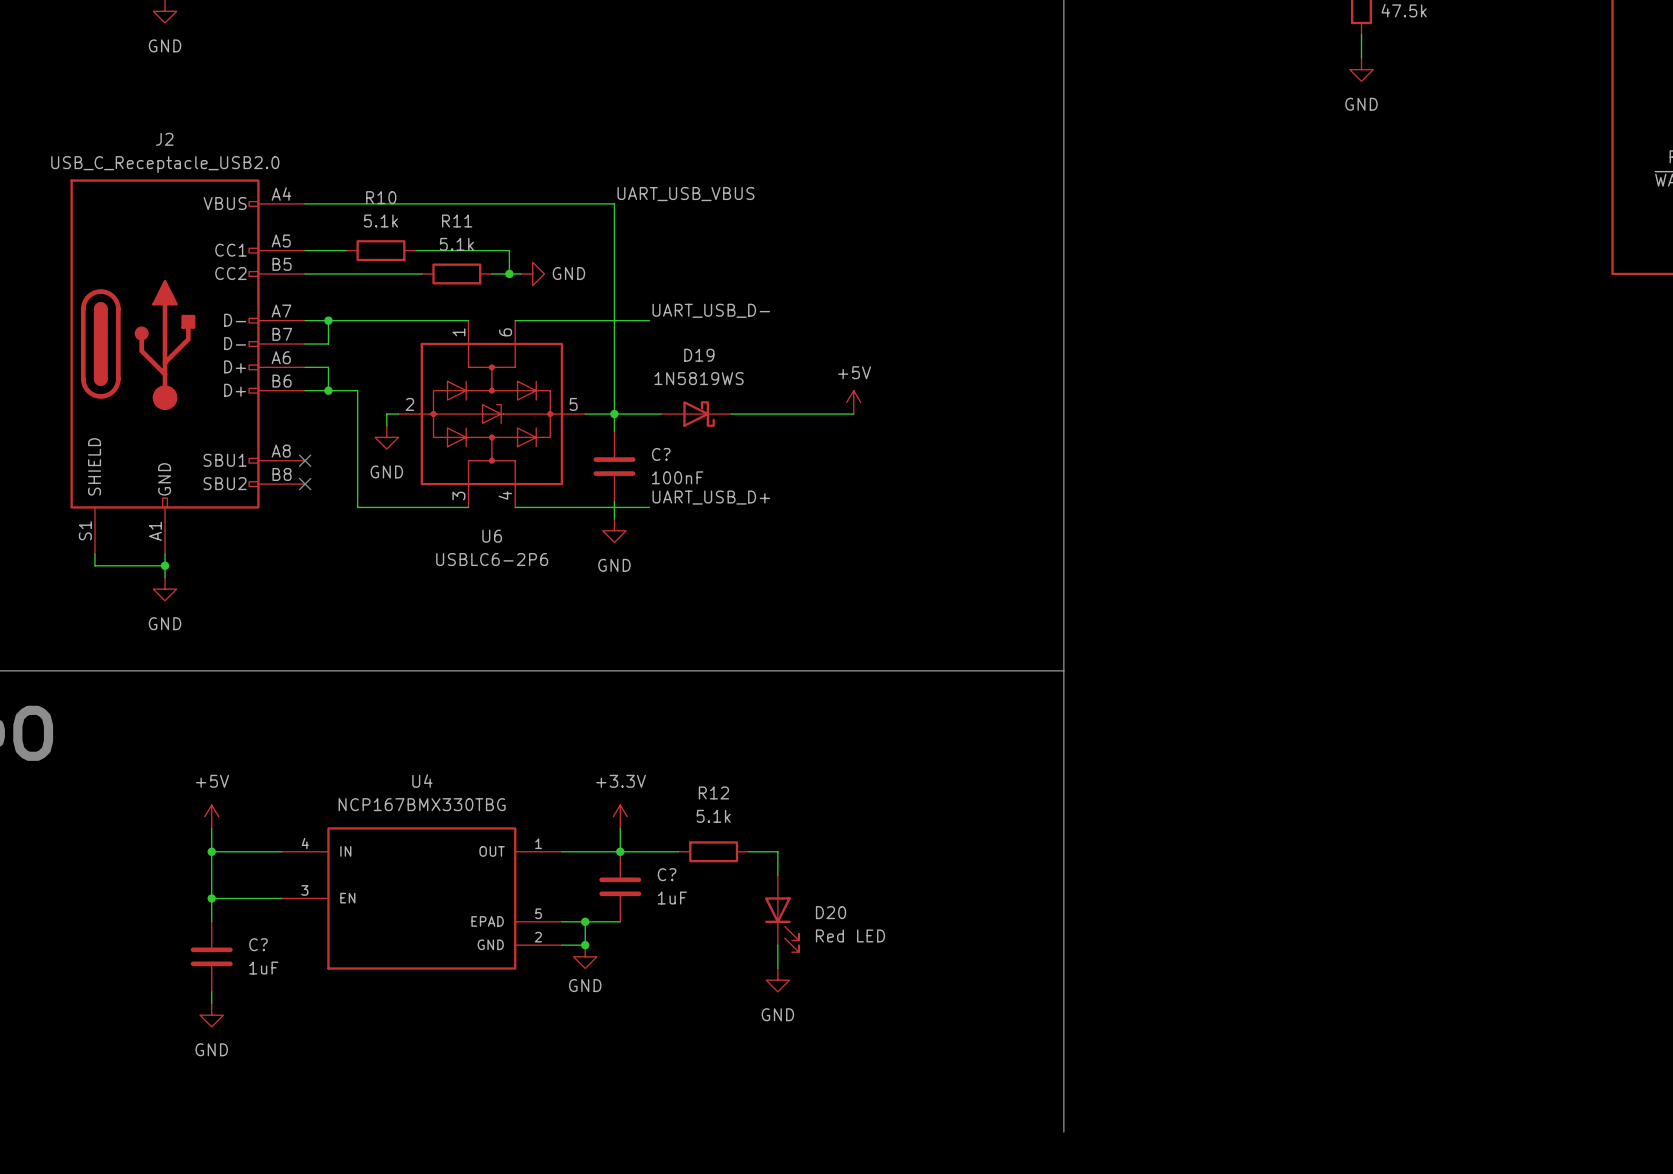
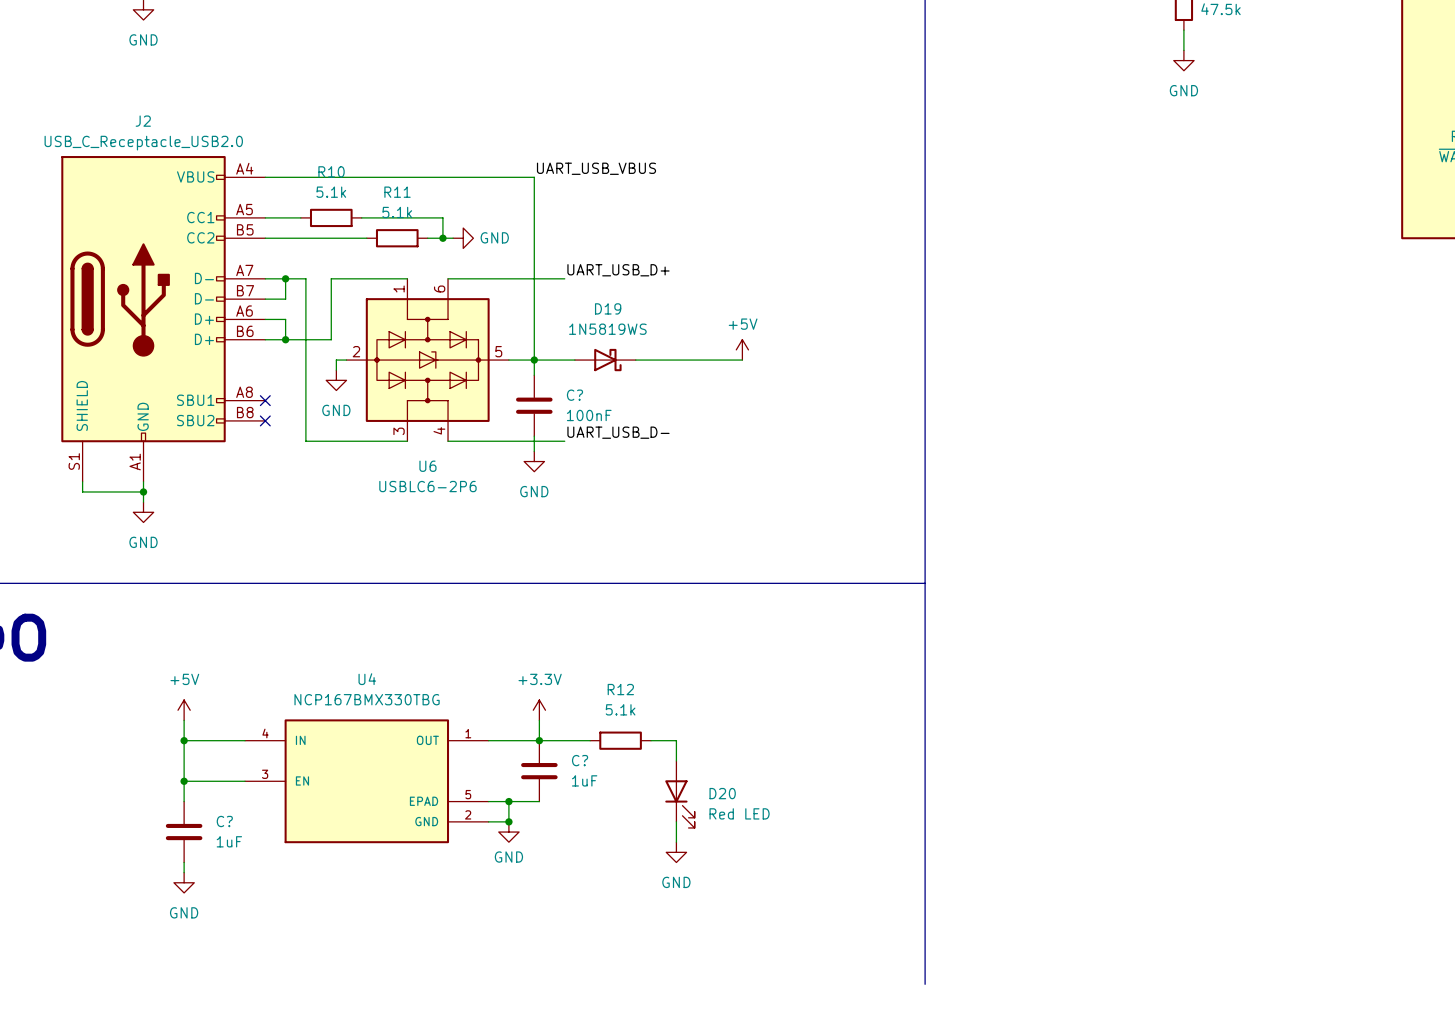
label: UART_USB_D- (711, 310) -> UART_USB_D+ (618, 270)
wire: (351, 320) (380, 320) -> (310, 339) (331, 339) (331, 278)
wire: (357, 390) (357, 507) -> (305, 278) (305, 441) (310, 441)
label: UART_USB_D+ (711, 497) -> UART_USB_D- (618, 432)

